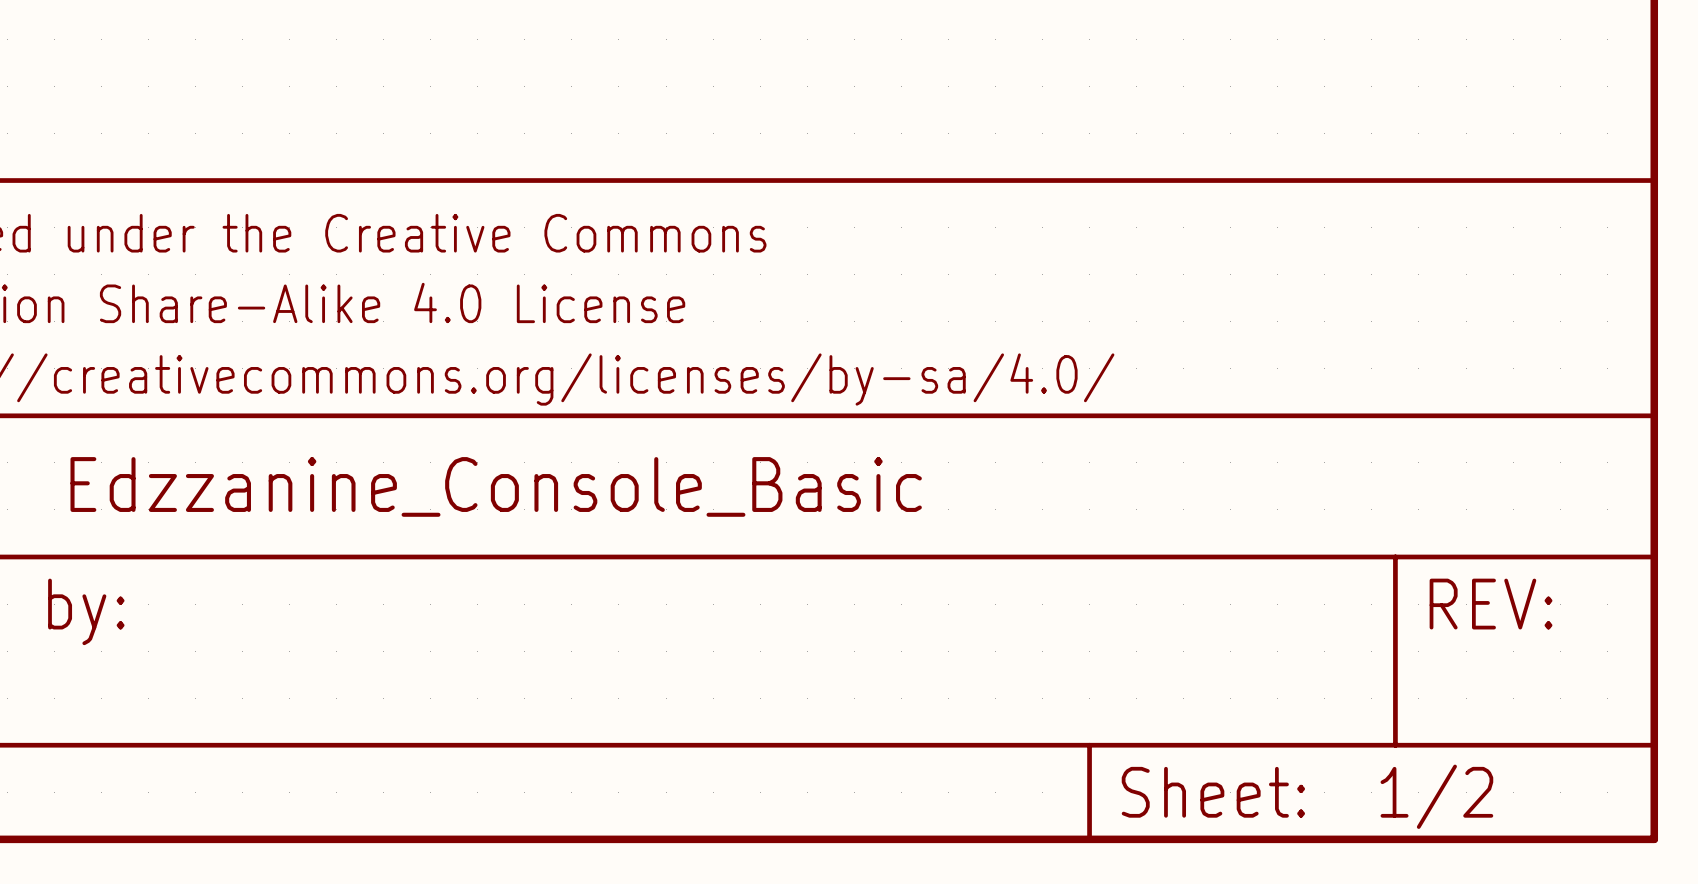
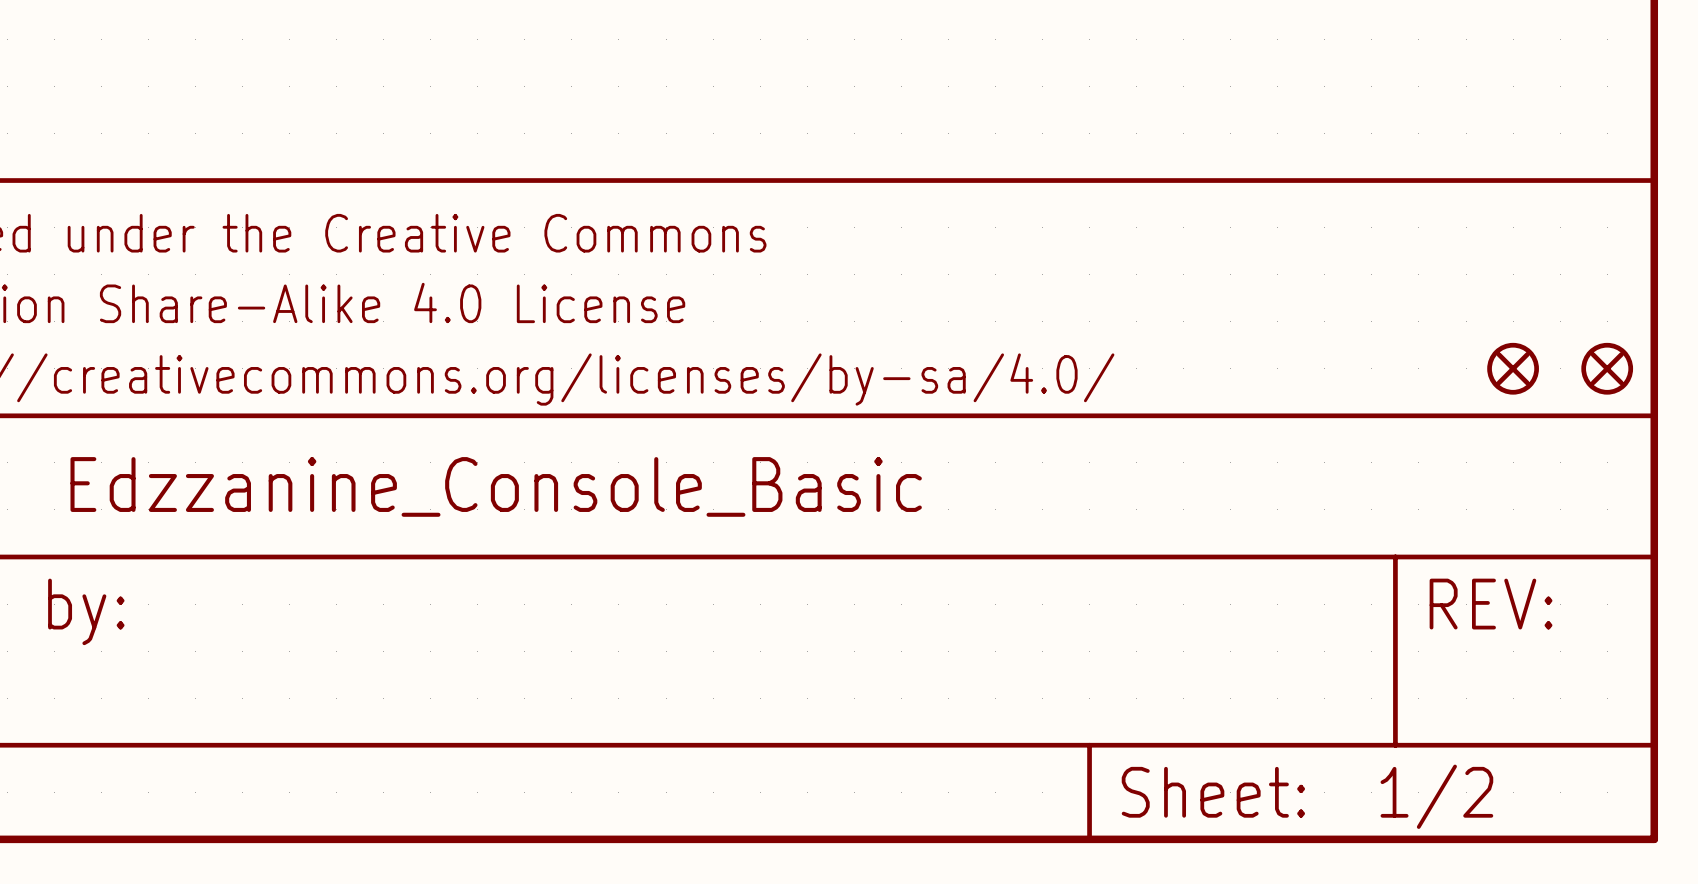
part: none -> (1513, 368)
part: none -> (1607, 368)

